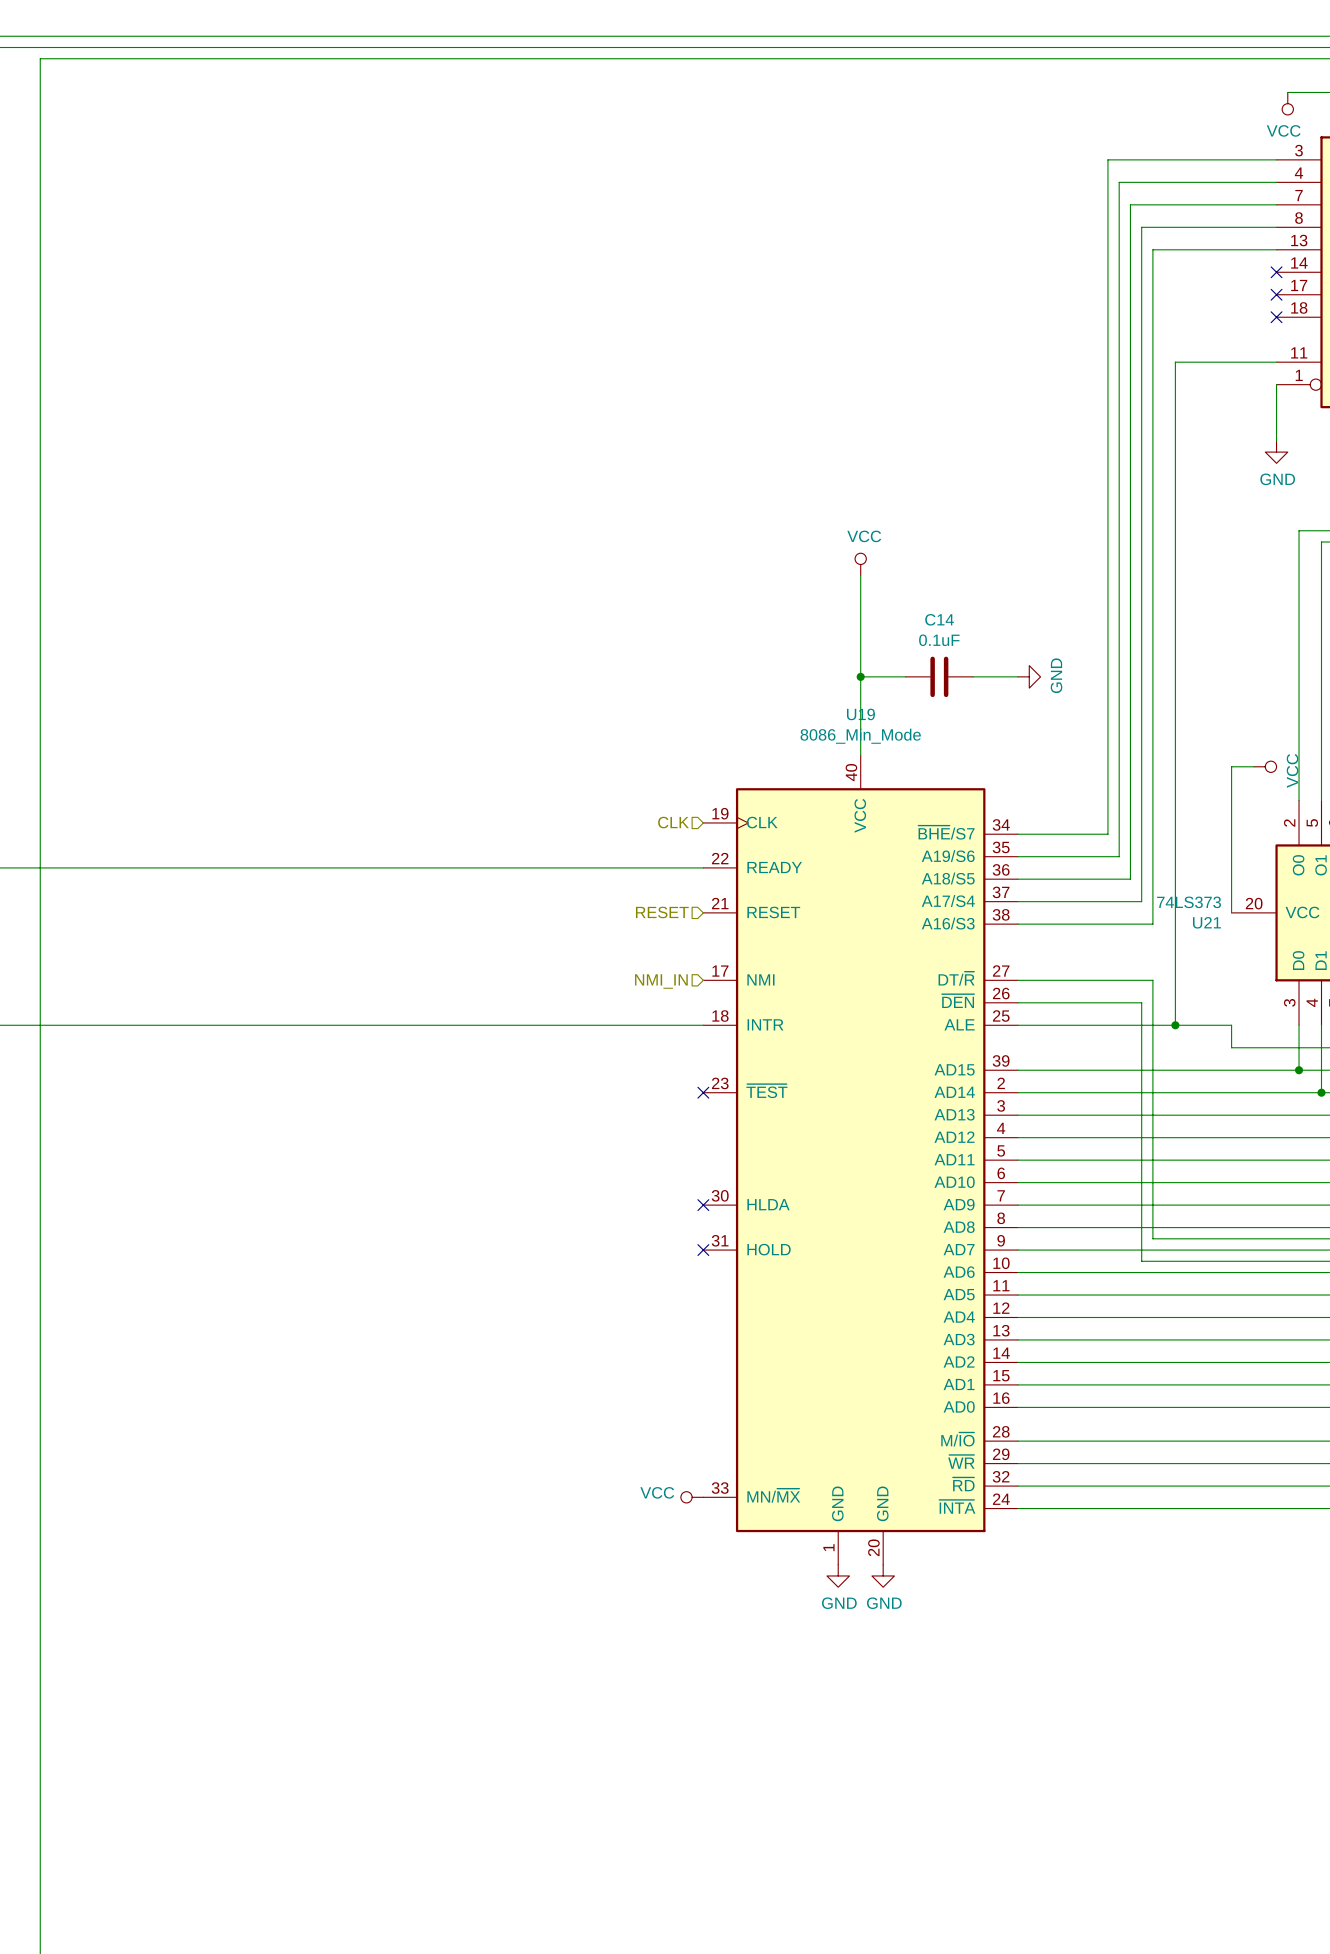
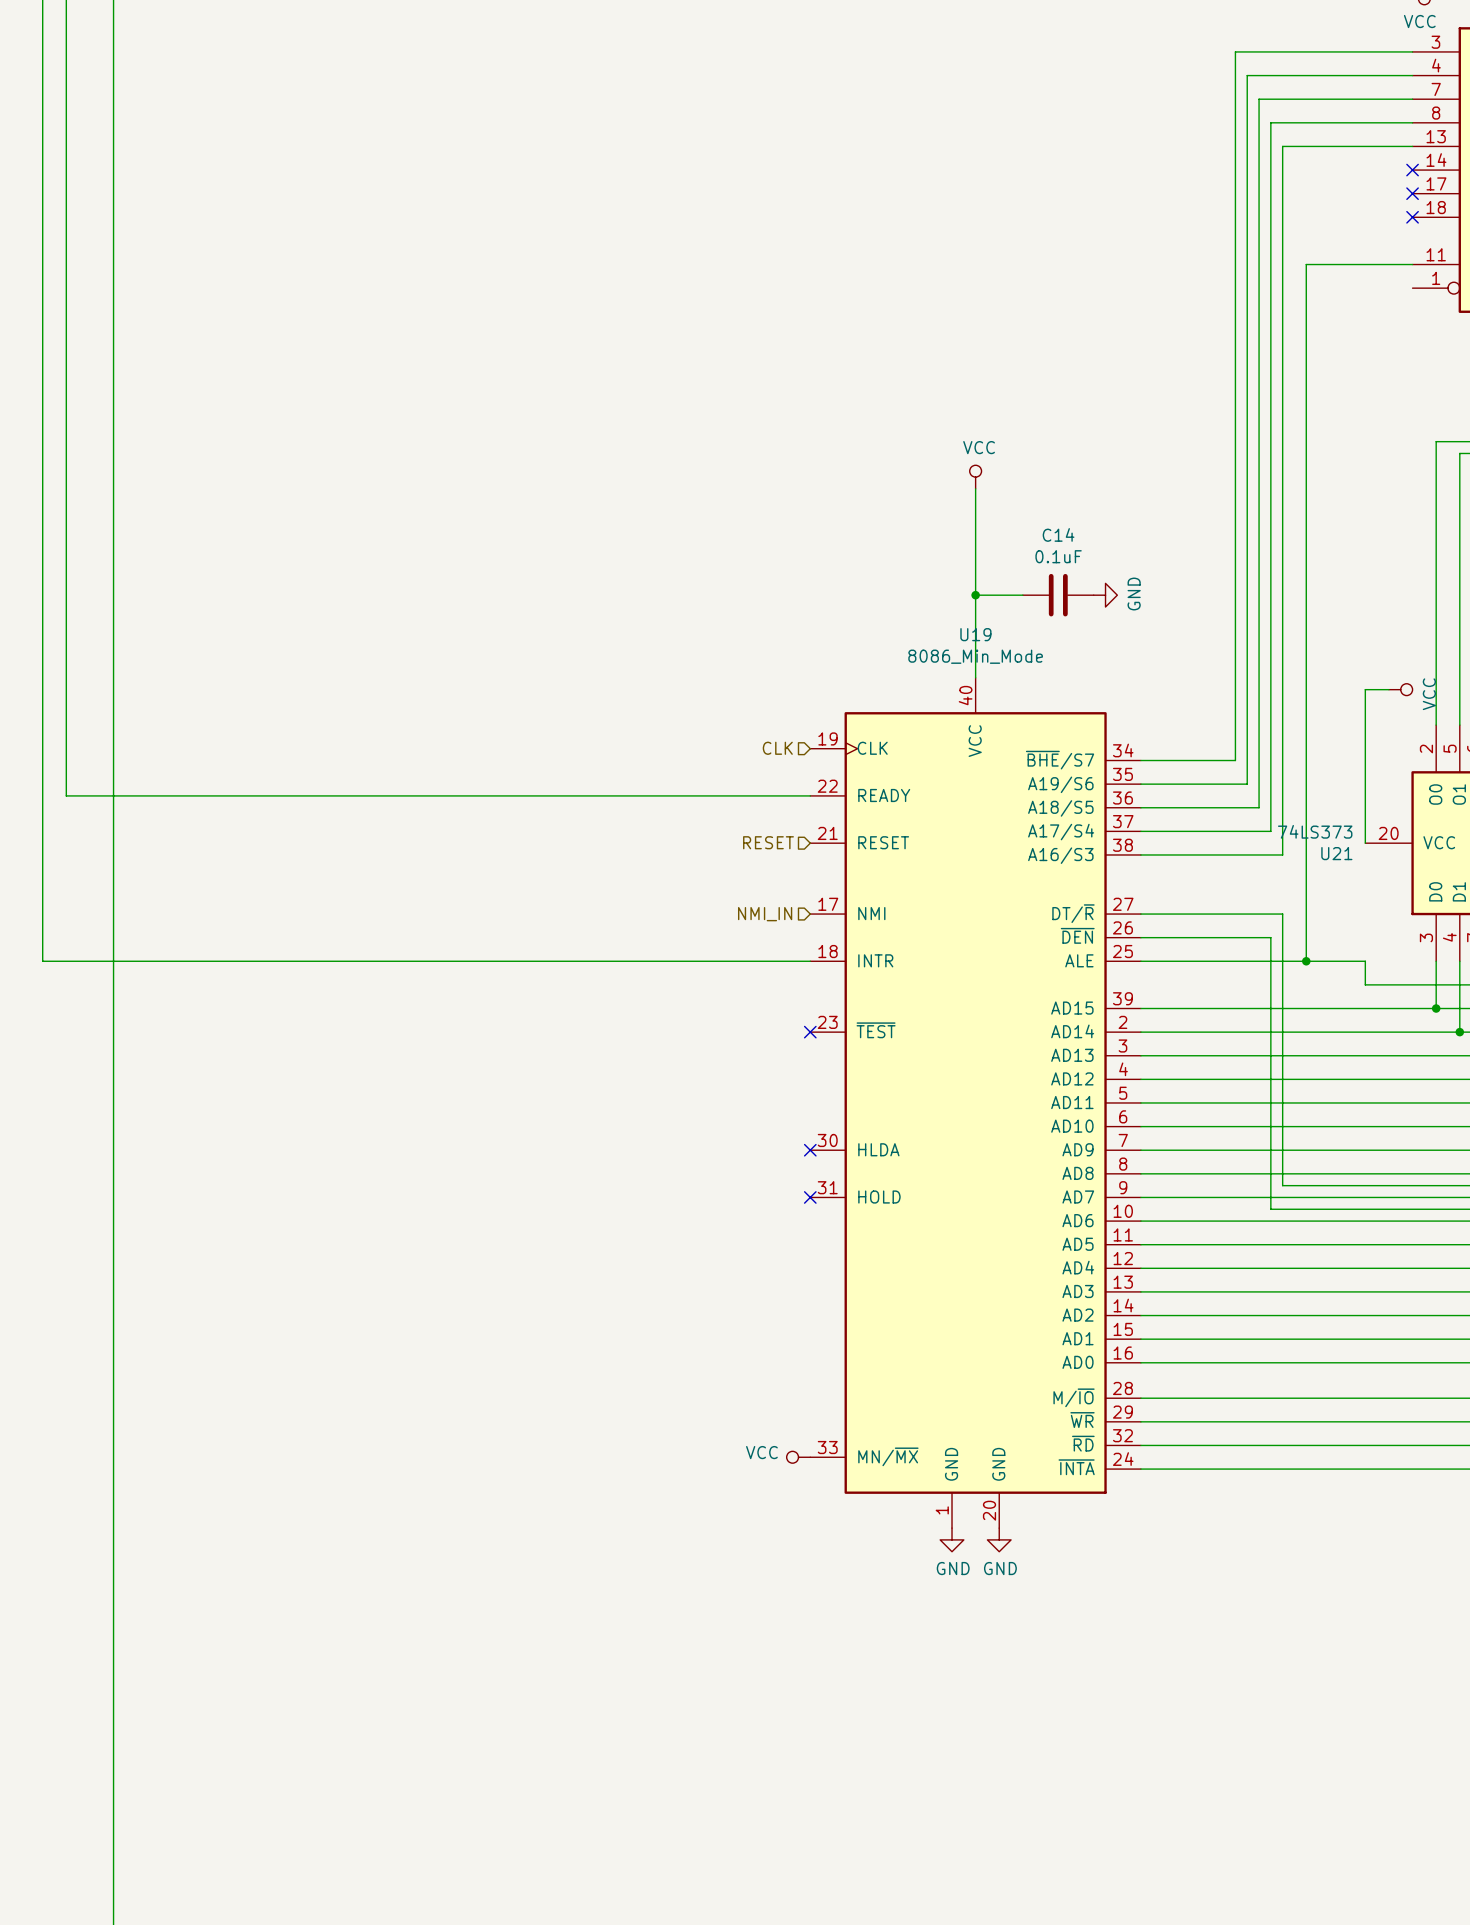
wire: (1276, 384) (1276, 440) -> none
power symbol: GND (1276, 452) -> none
wire: (973, 676) (1018, 676) -> none
power symbol position: GND (1029, 676) -> GND (1105, 595)

